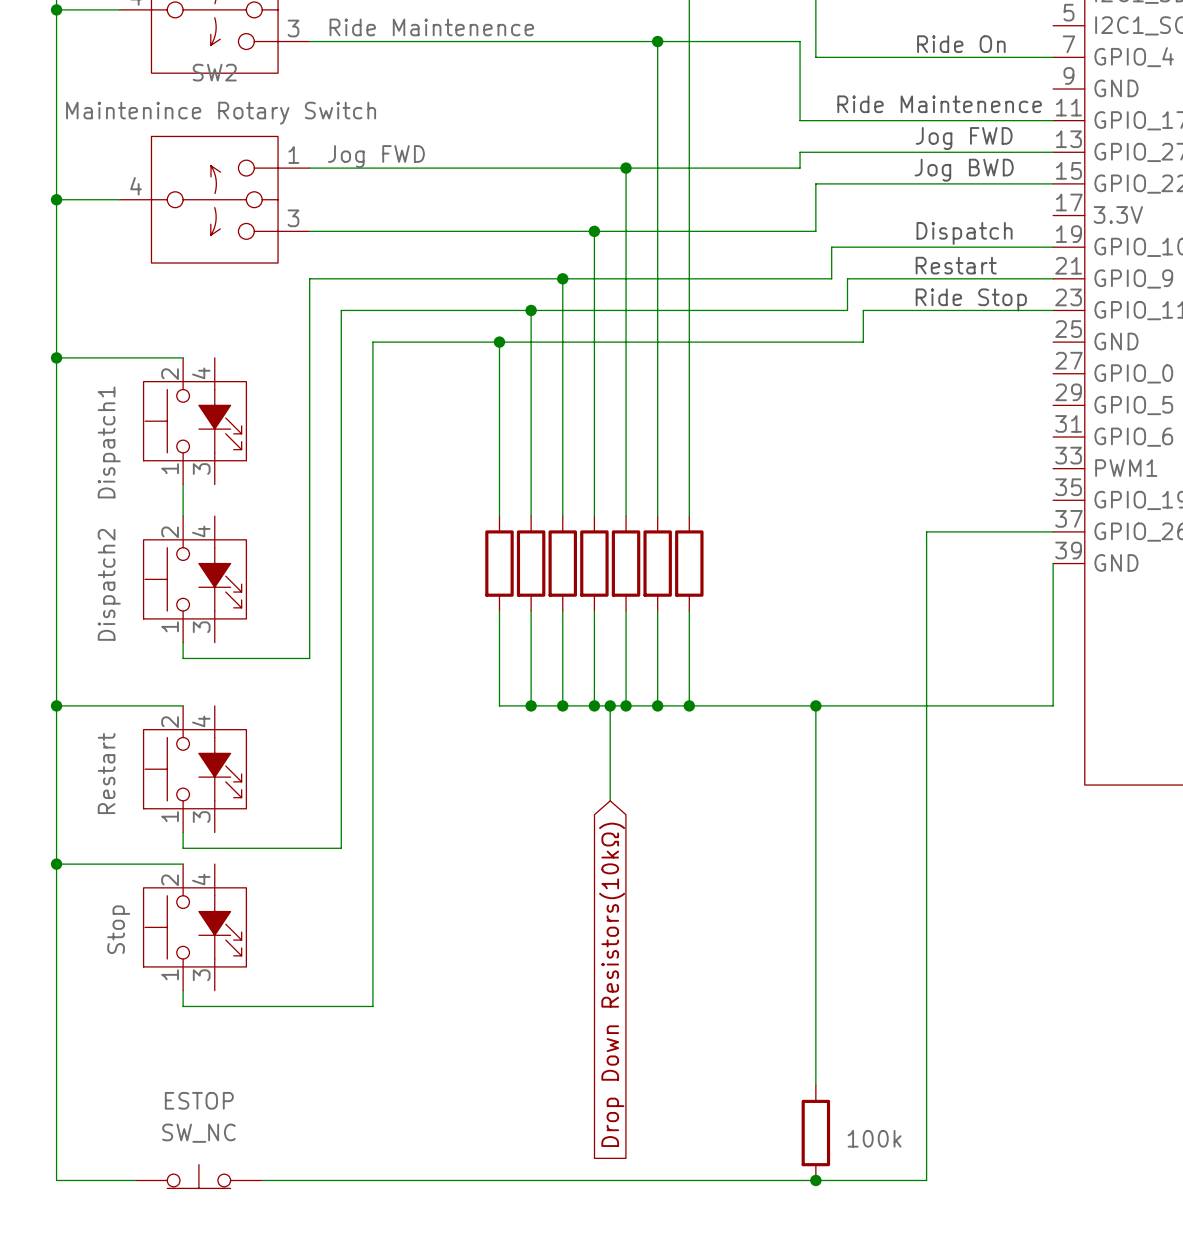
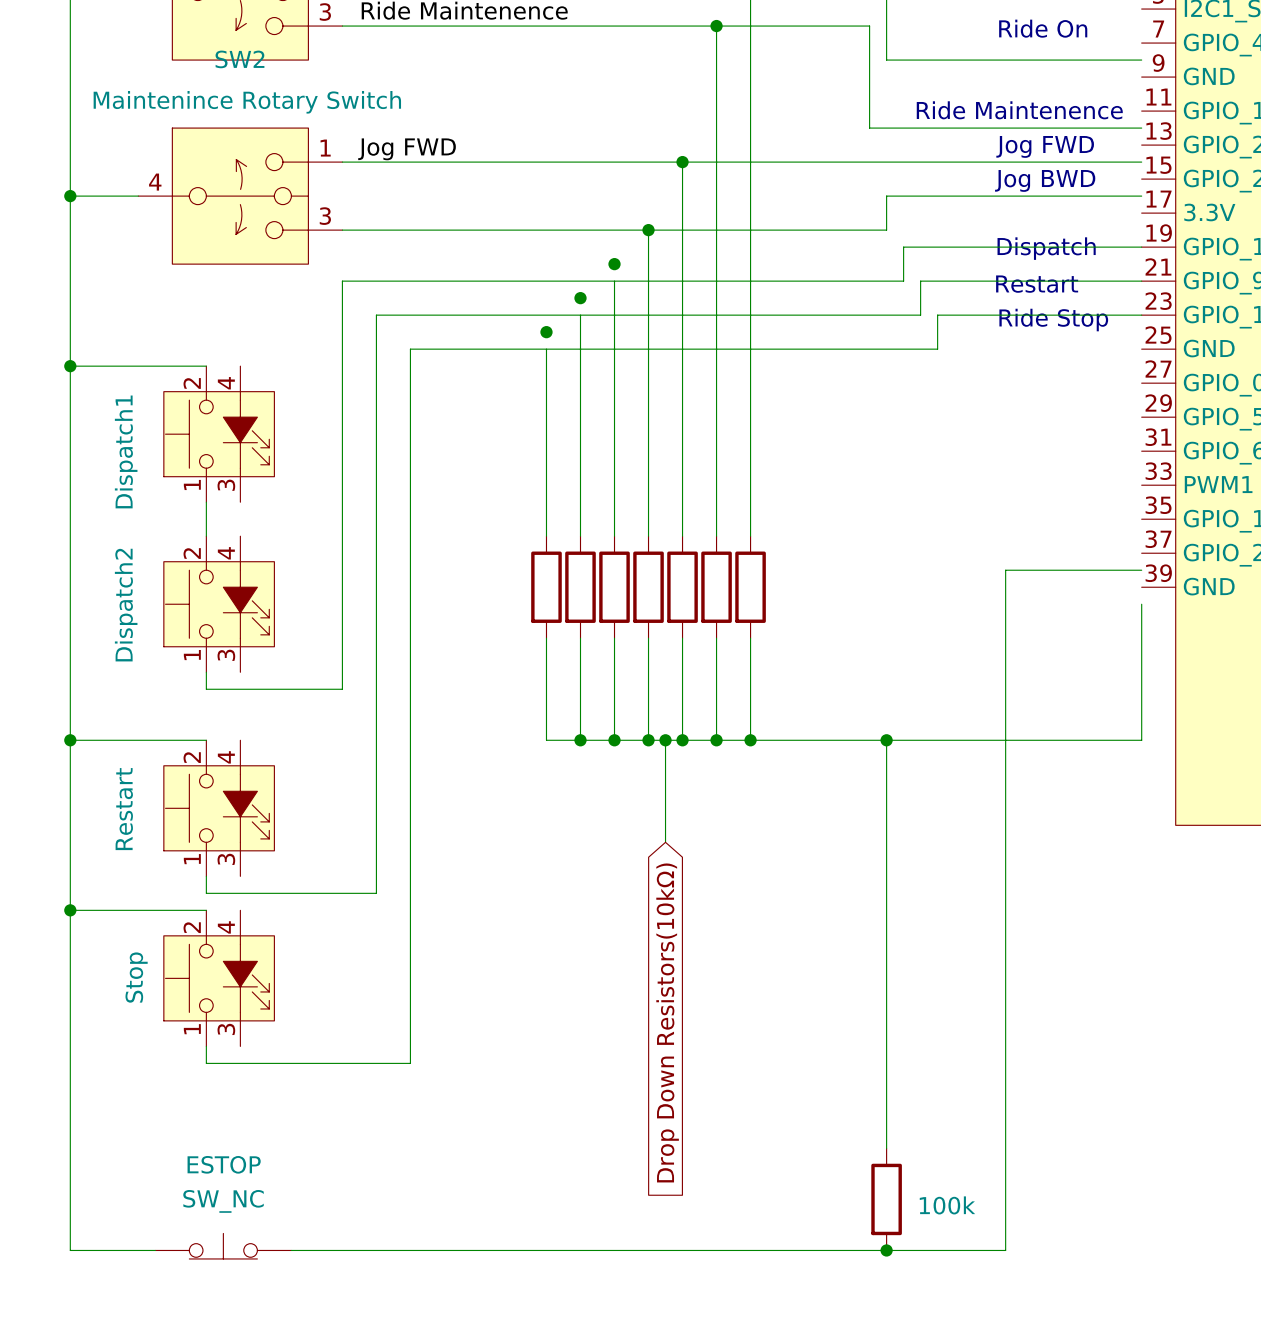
wire: (815, 57) (1053, 57) -> (886, 43) (886, 60) (1141, 60)
text position: Ride Maintenence (939, 104) -> Ride Maintenence (1019, 110)
wire: (800, 120) (1053, 120) -> (869, 111) (869, 128) (1141, 128)
text position: Jog FWD (964, 138) -> Jog FWD (1045, 146)
wire: (1053, 152) (800, 152) (800, 168) -> (1141, 162) (869, 162)
text position: Jog BWD (964, 170) -> Jog BWD (1045, 180)
wire: (1053, 183) (815, 183) (815, 199) -> (1141, 196) (886, 196)
text position: Dispatch (964, 233) -> Dispatch (1046, 248)
text position: Restart (956, 265) -> Restart (1037, 284)
junction position: (562, 278) -> (614, 264)
text position: Ride Stop (971, 299) -> Ride Stop (1053, 320)
junction position: (531, 310) -> (580, 298)
junction position: (499, 342) -> (546, 332)
wire: (1053, 531) (926, 531) (926, 547) -> (1141, 570) (1005, 570)
wire: (1053, 563) (1053, 579) -> none

